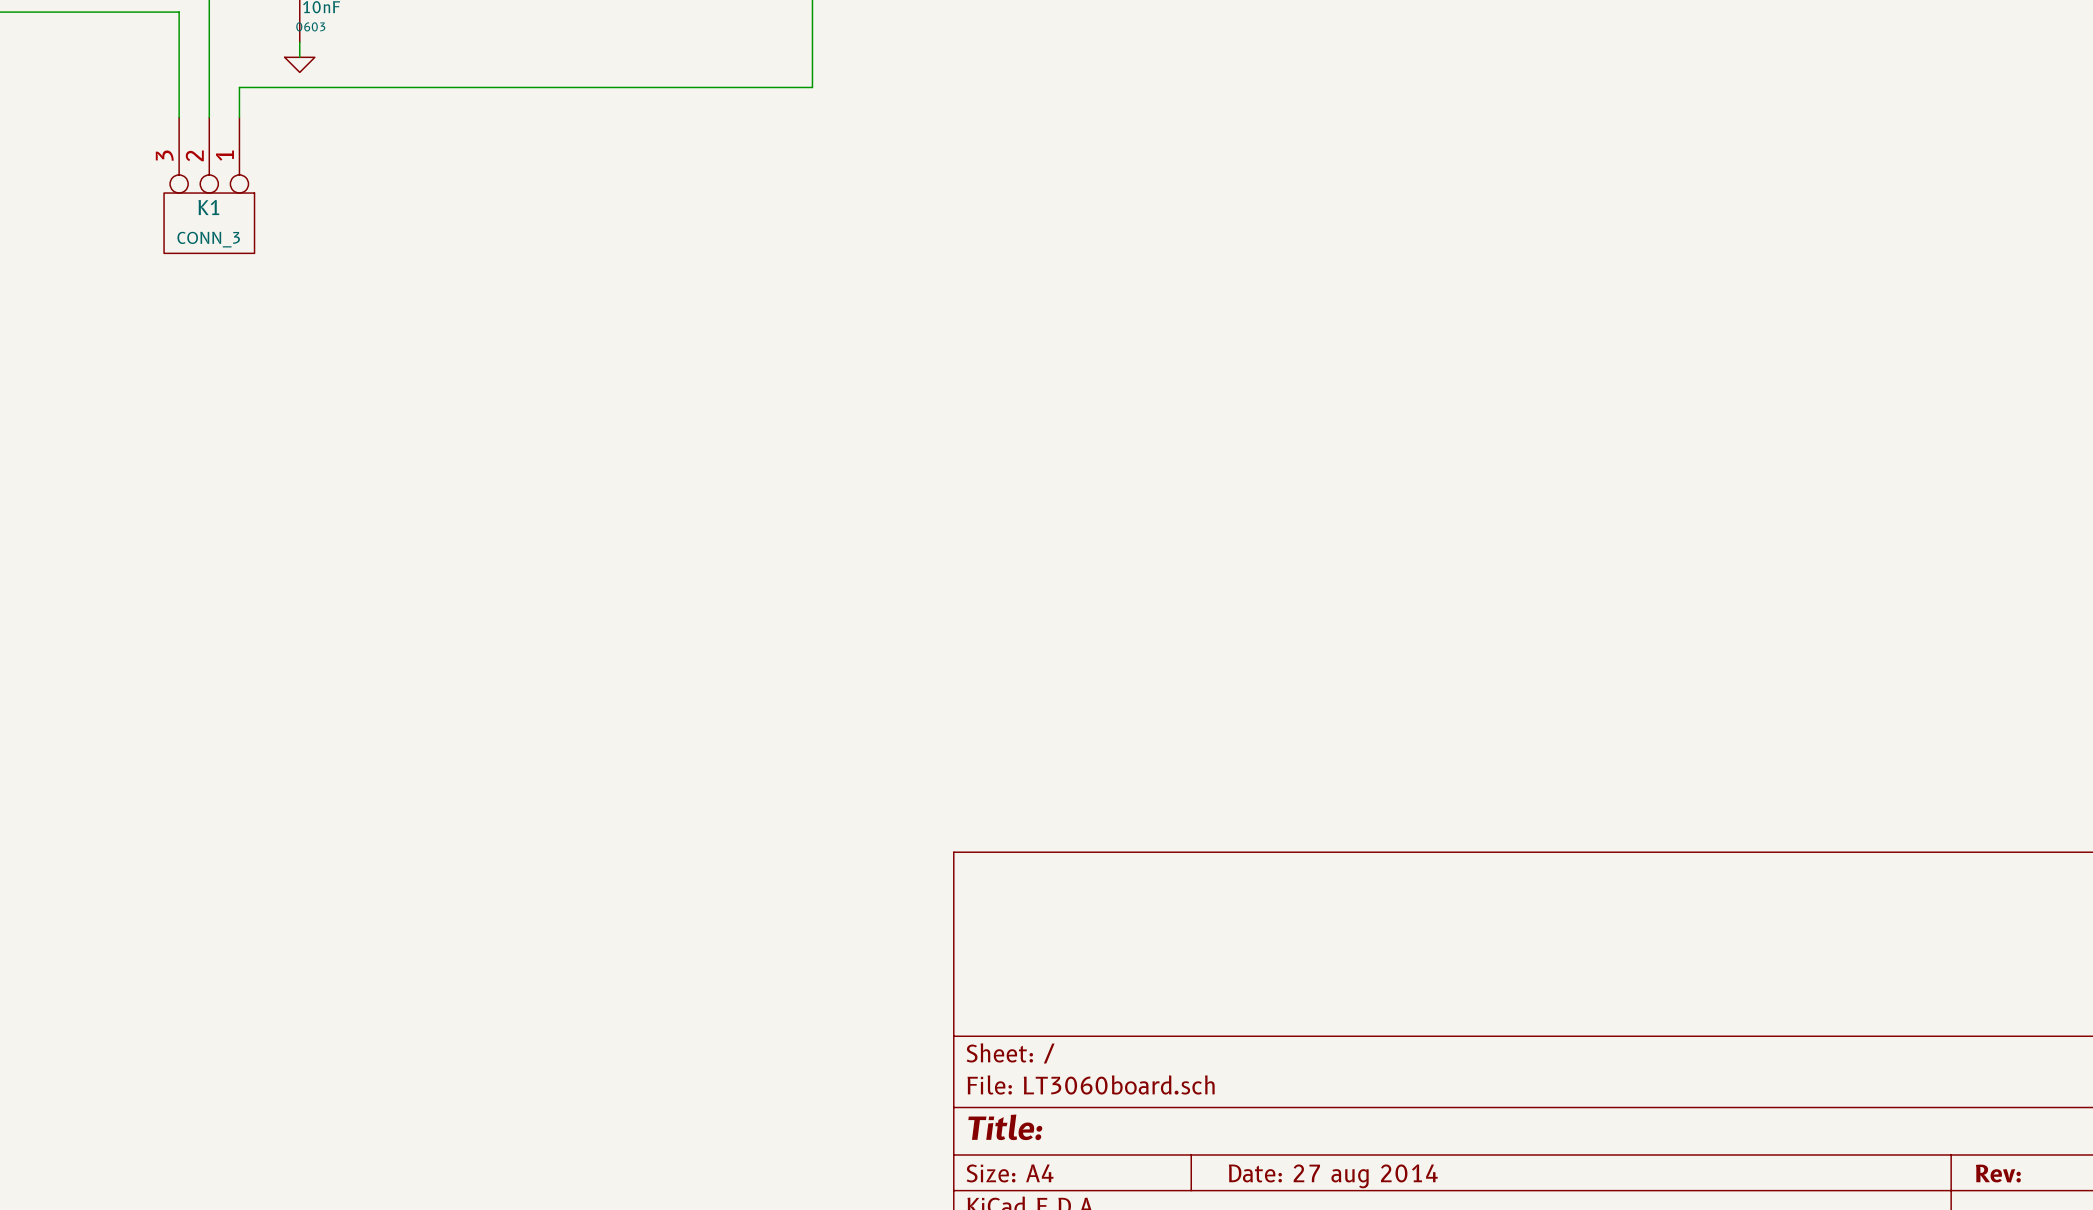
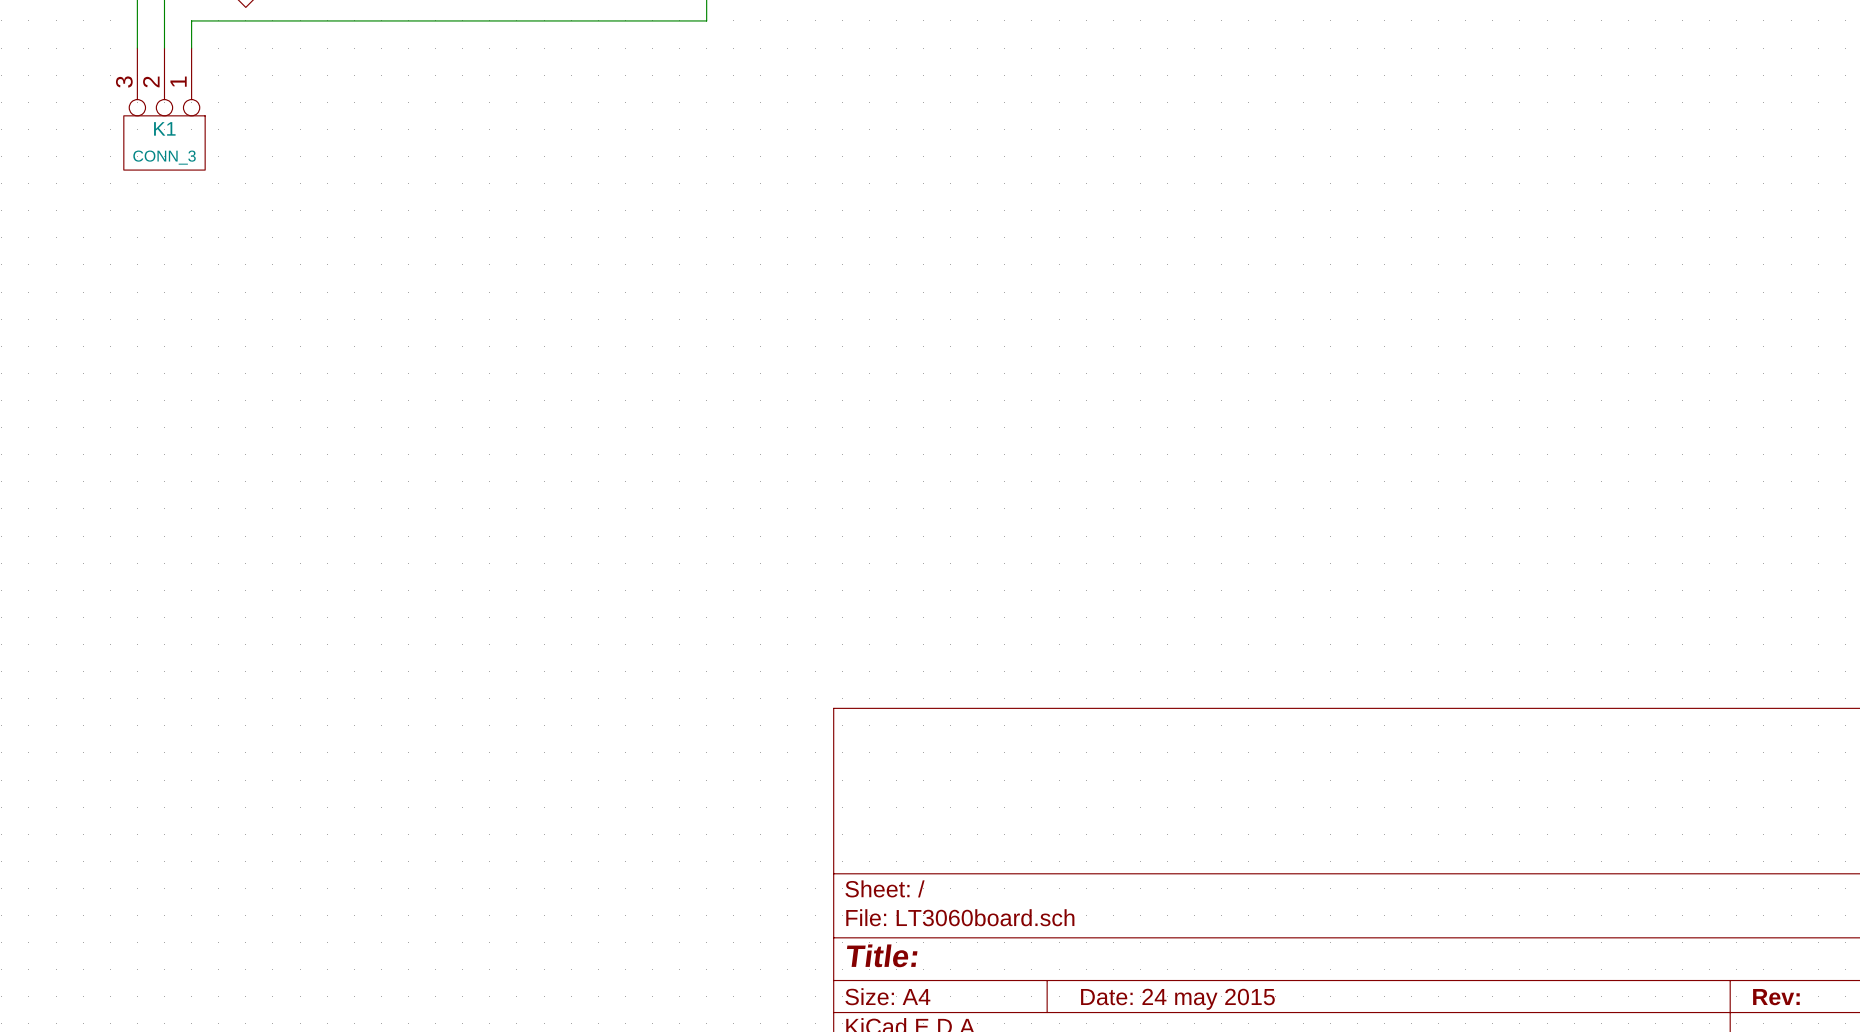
title block: Date: 27 aug 2014 (1333, 1176) -> Date: 24 may 2015 (1177, 999)

